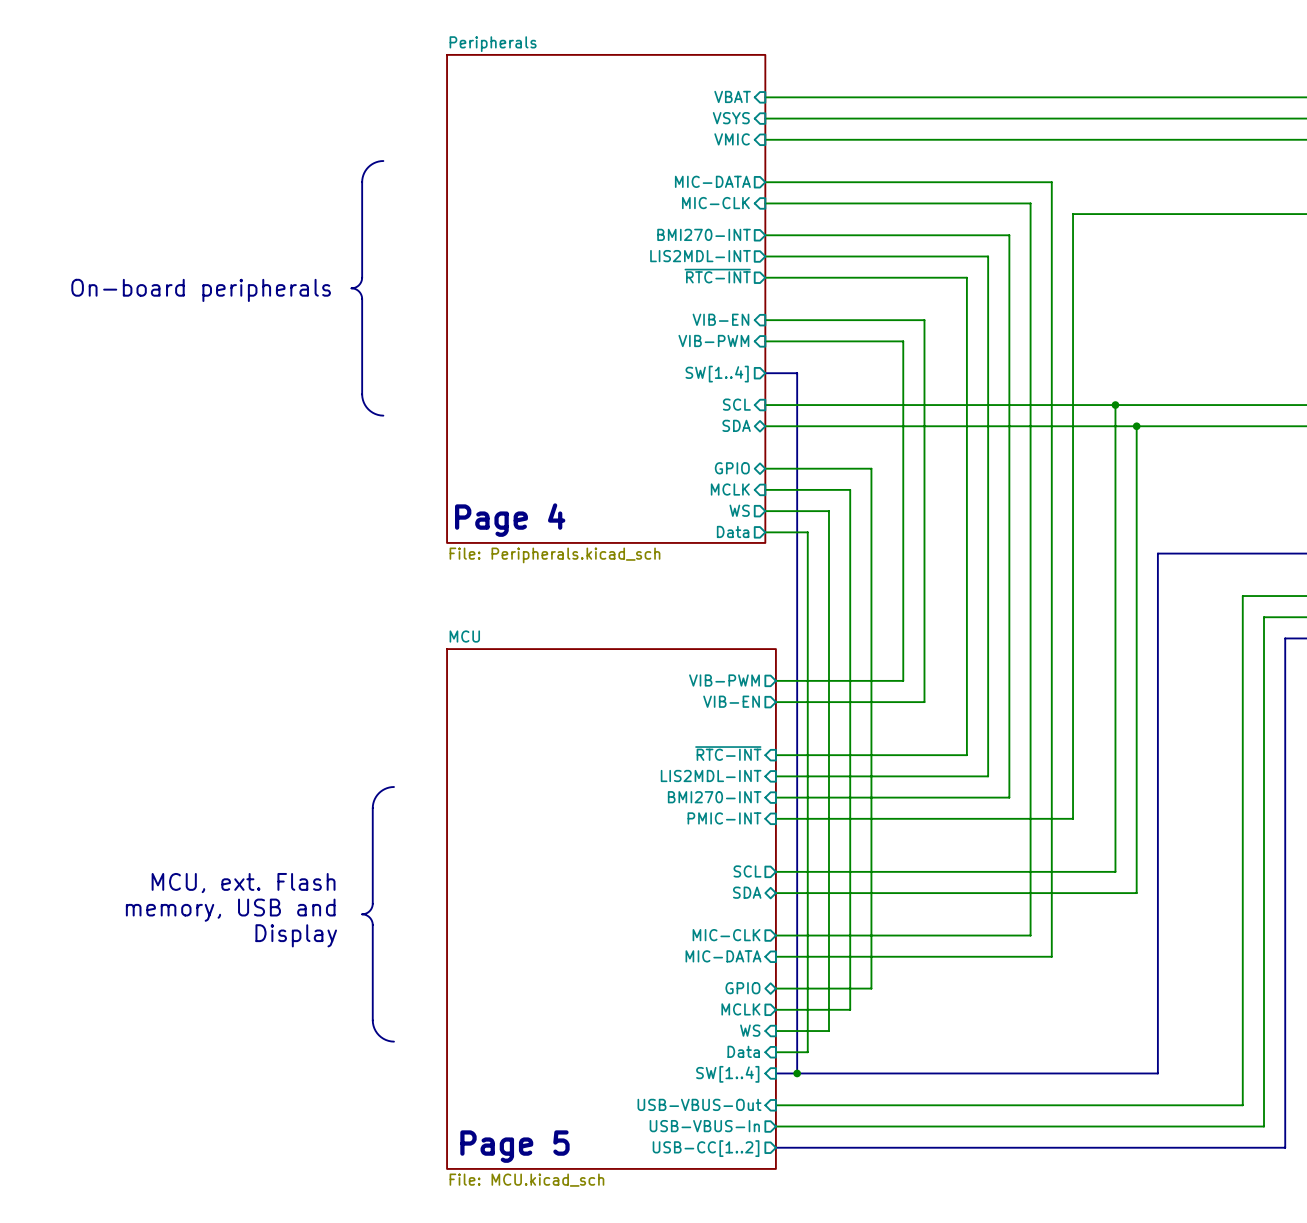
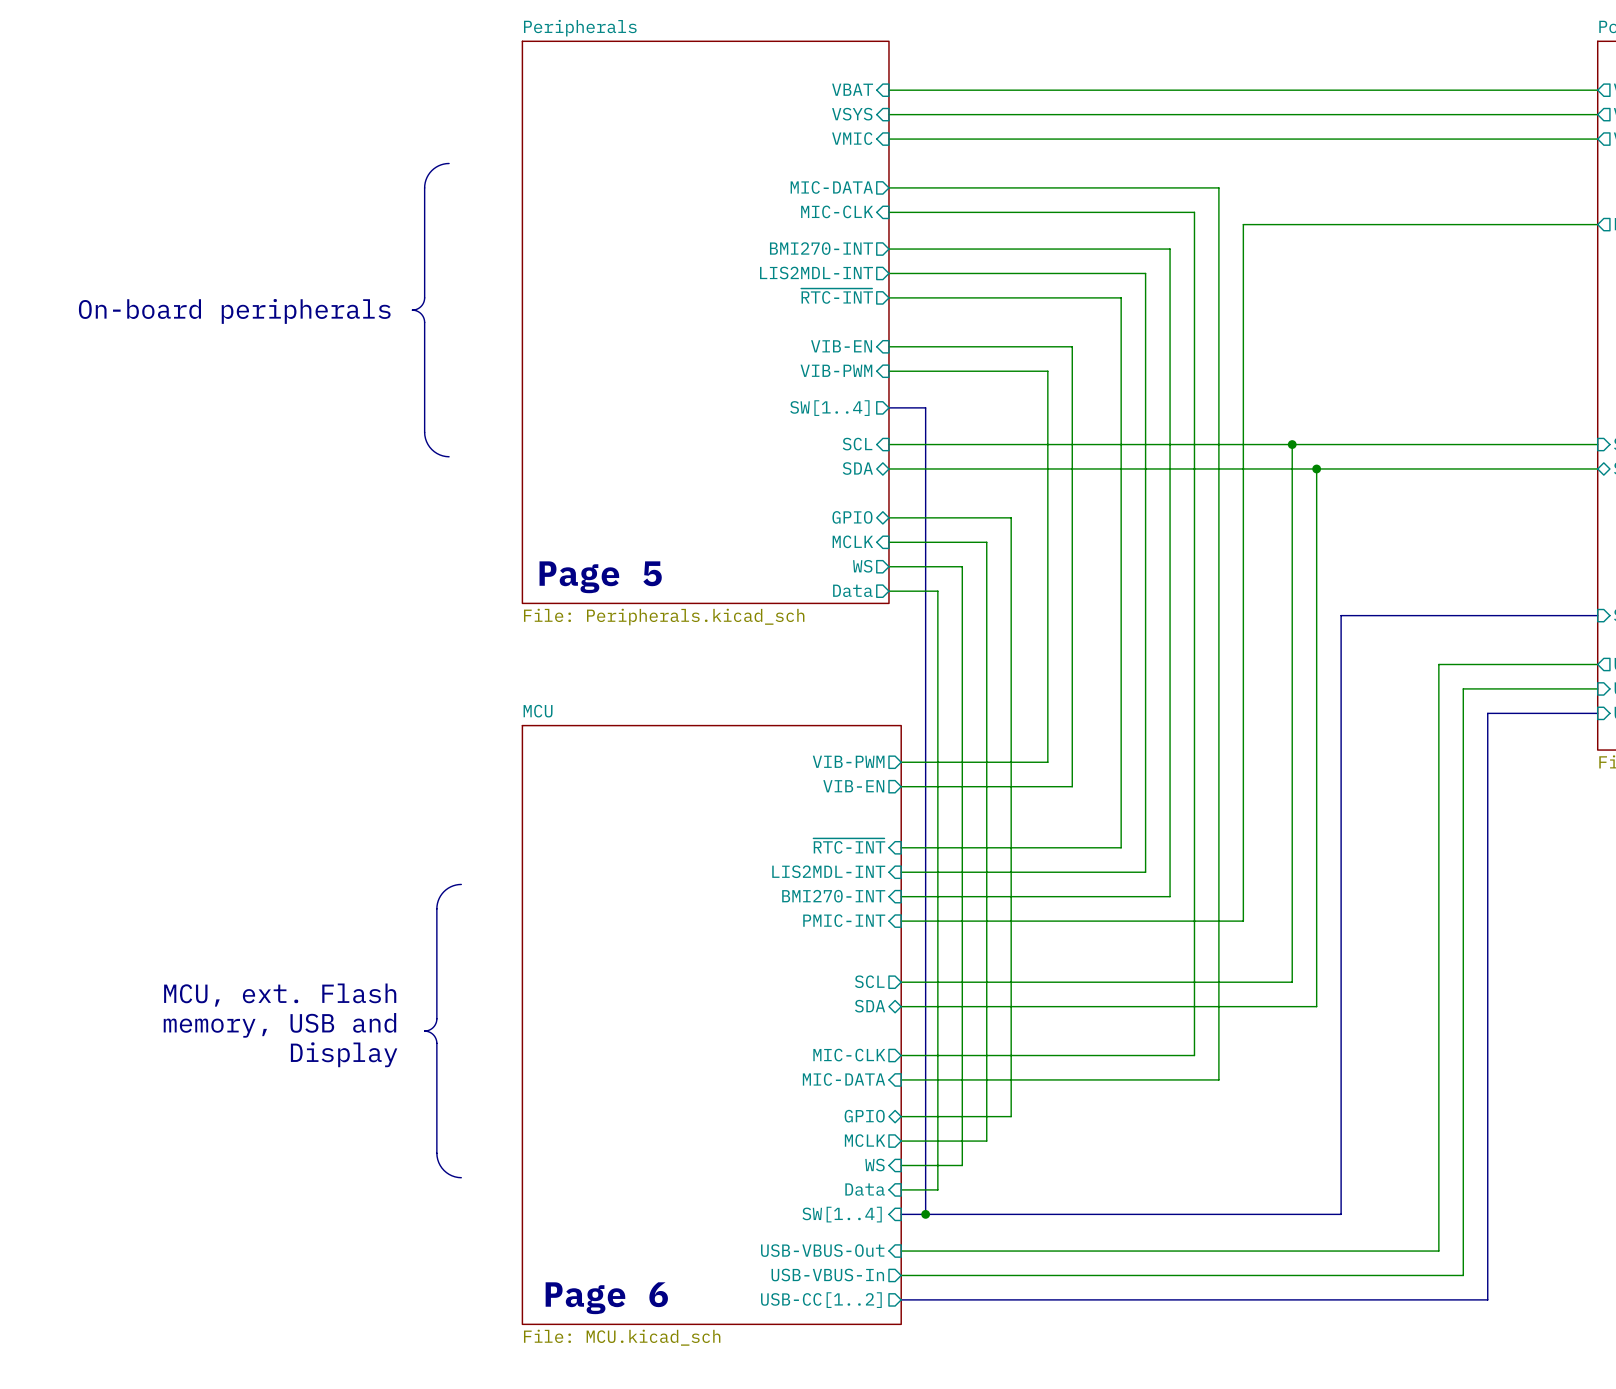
text: Page 4 (510, 520) -> Page 5 (600, 577)
text: Page 5 (514, 1146) -> Page 6 (606, 1298)

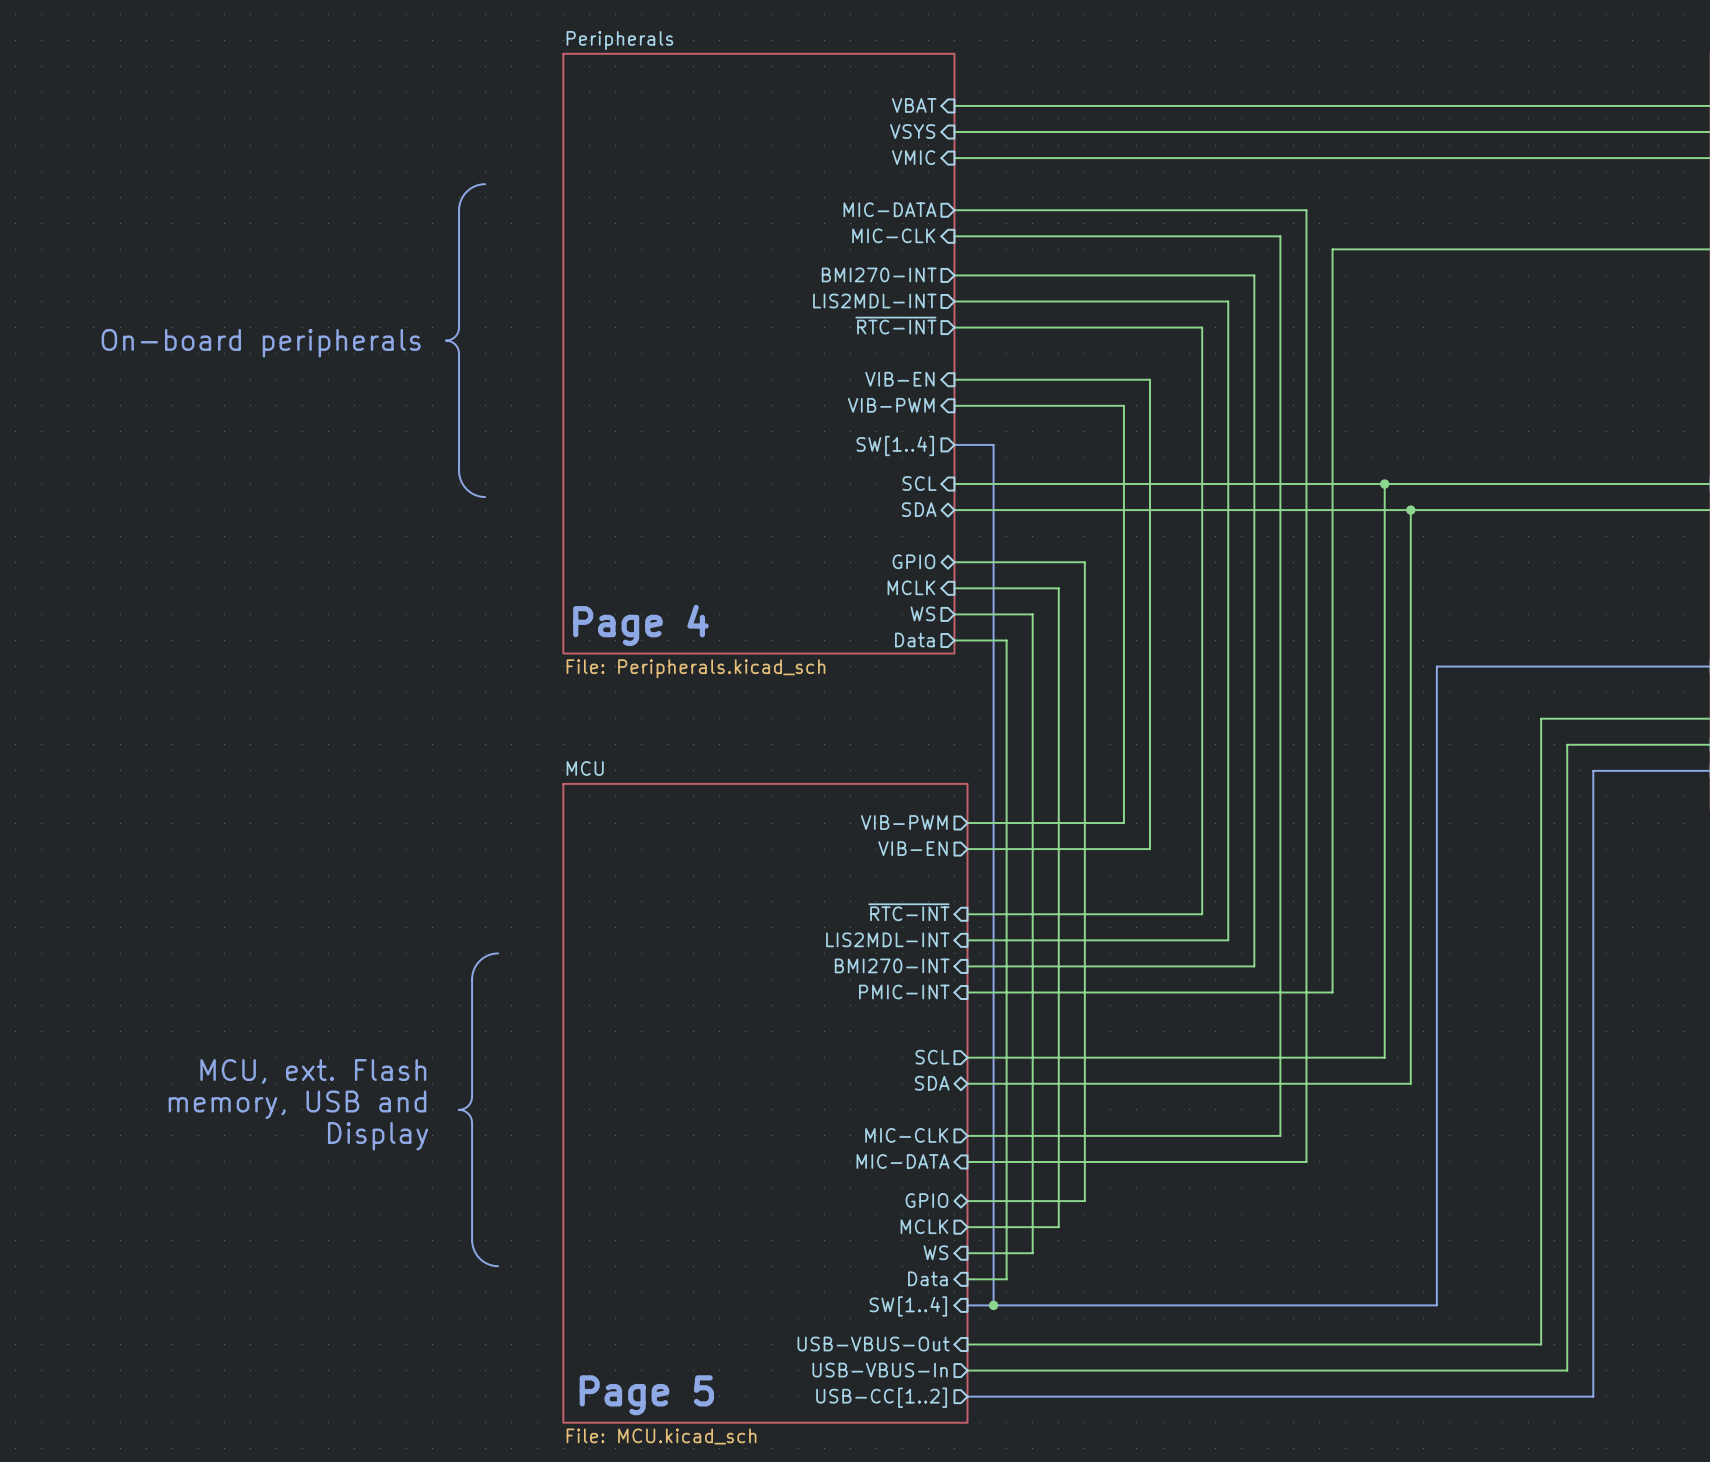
text: Page 5 (600, 577) -> Page 4 (640, 625)
text: Page 6 (606, 1298) -> Page 5 (646, 1395)

